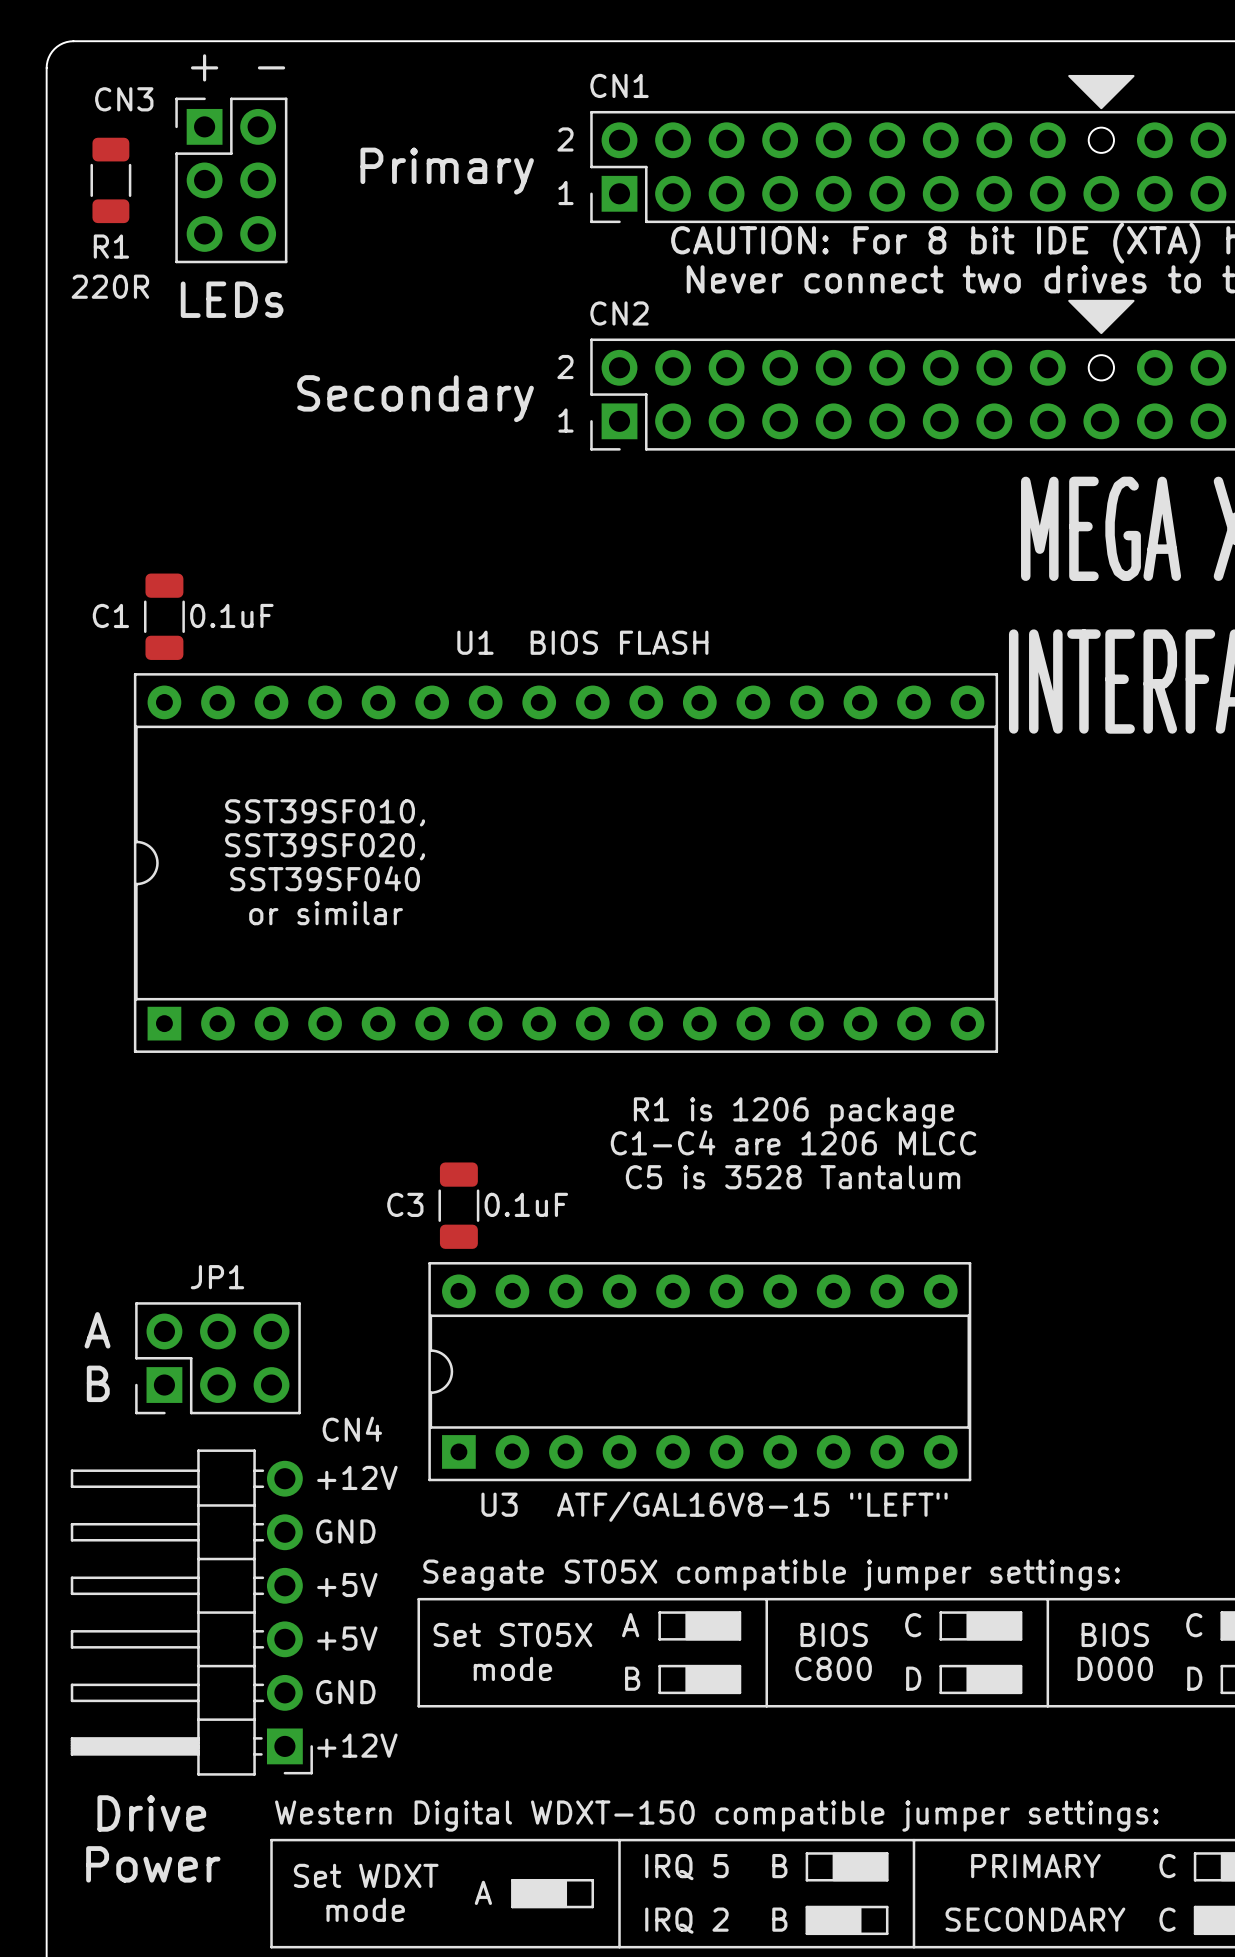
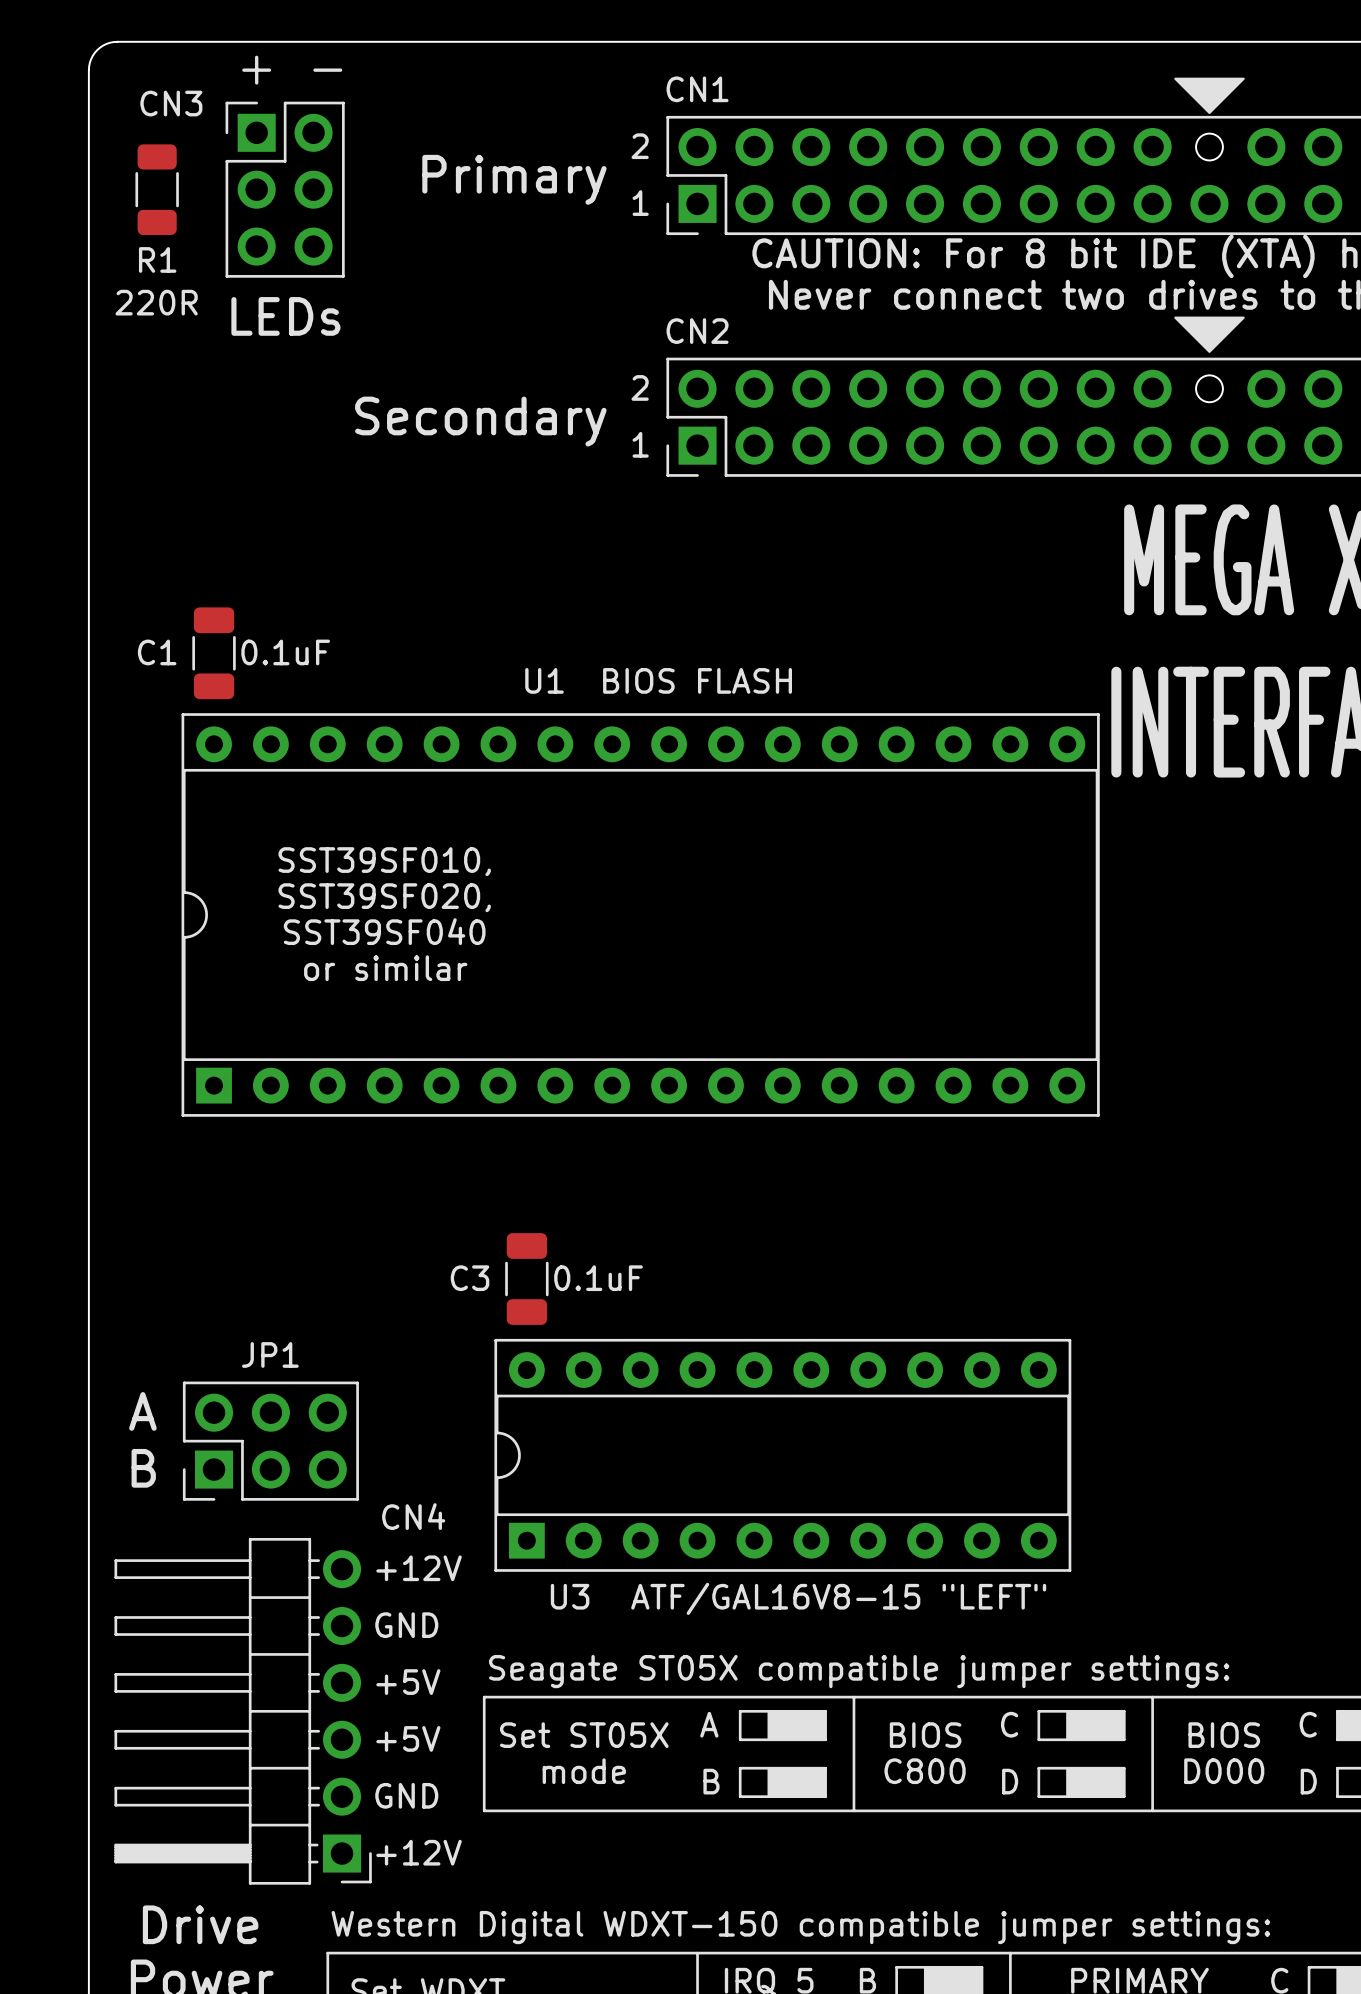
text: R1 is 1206 package (794, 1112) -> none
text: C1-C4 are 1206 MLCC (793, 1142) -> none
text: C5 is 3528 Tantalum (793, 1177) -> none

